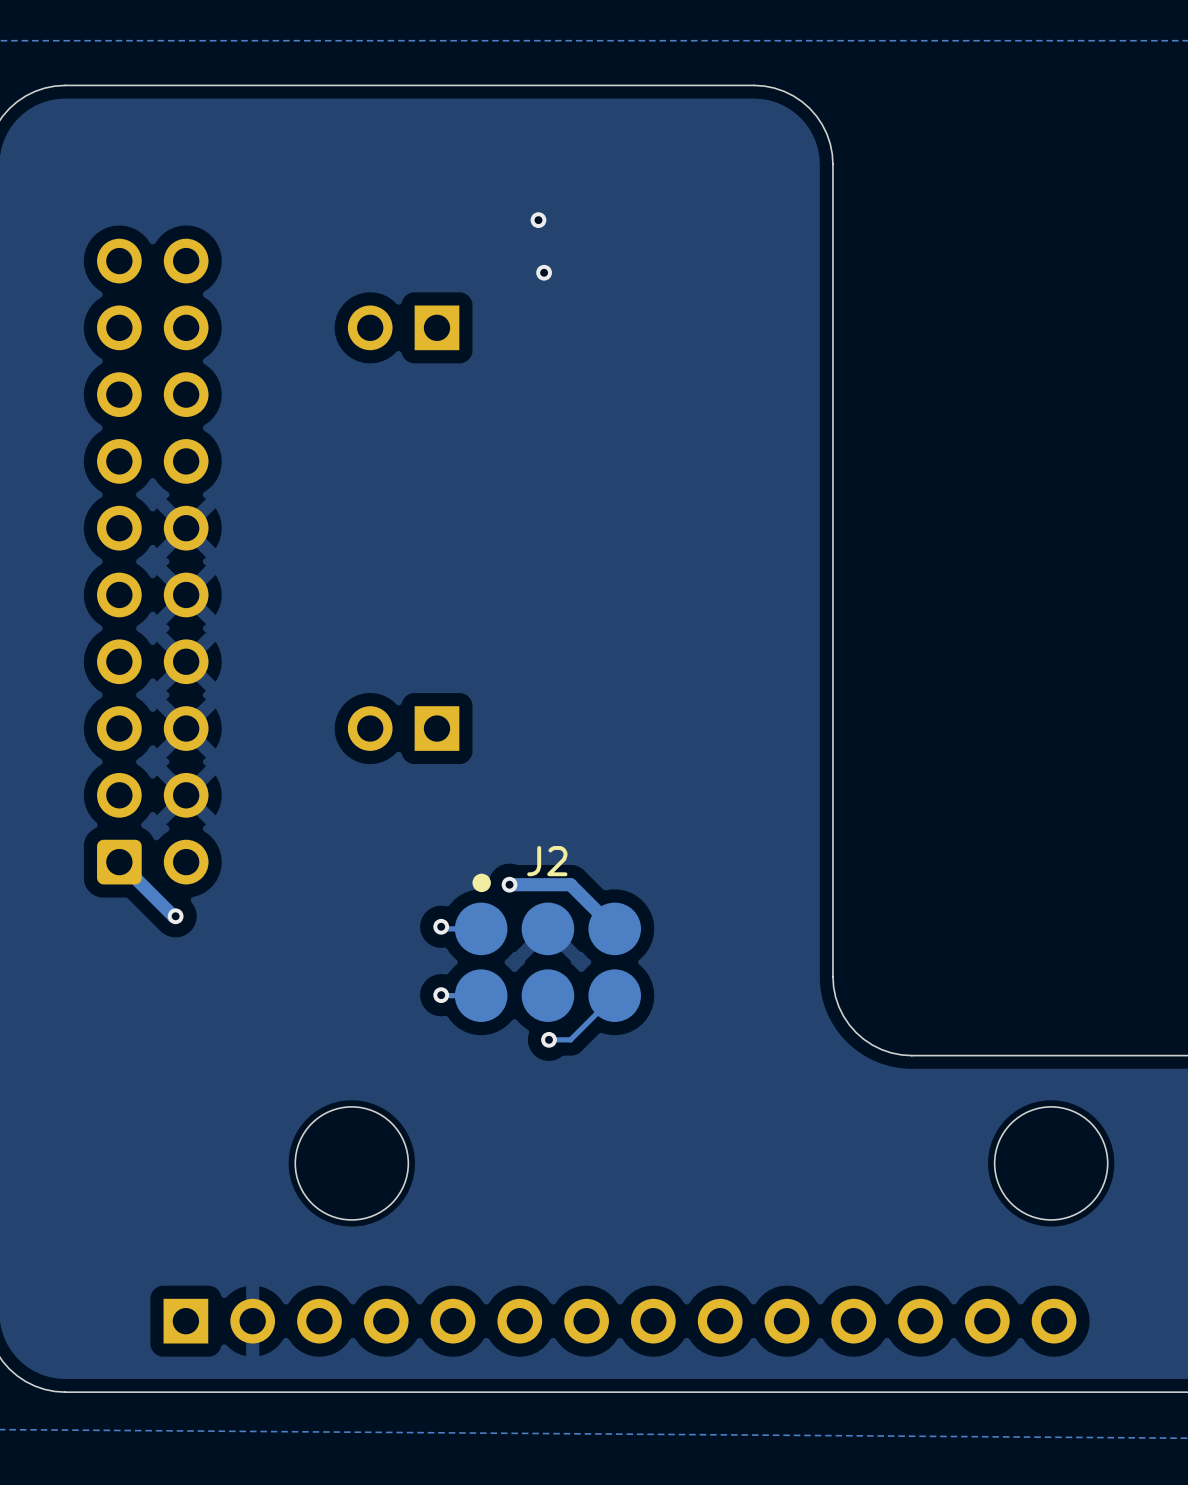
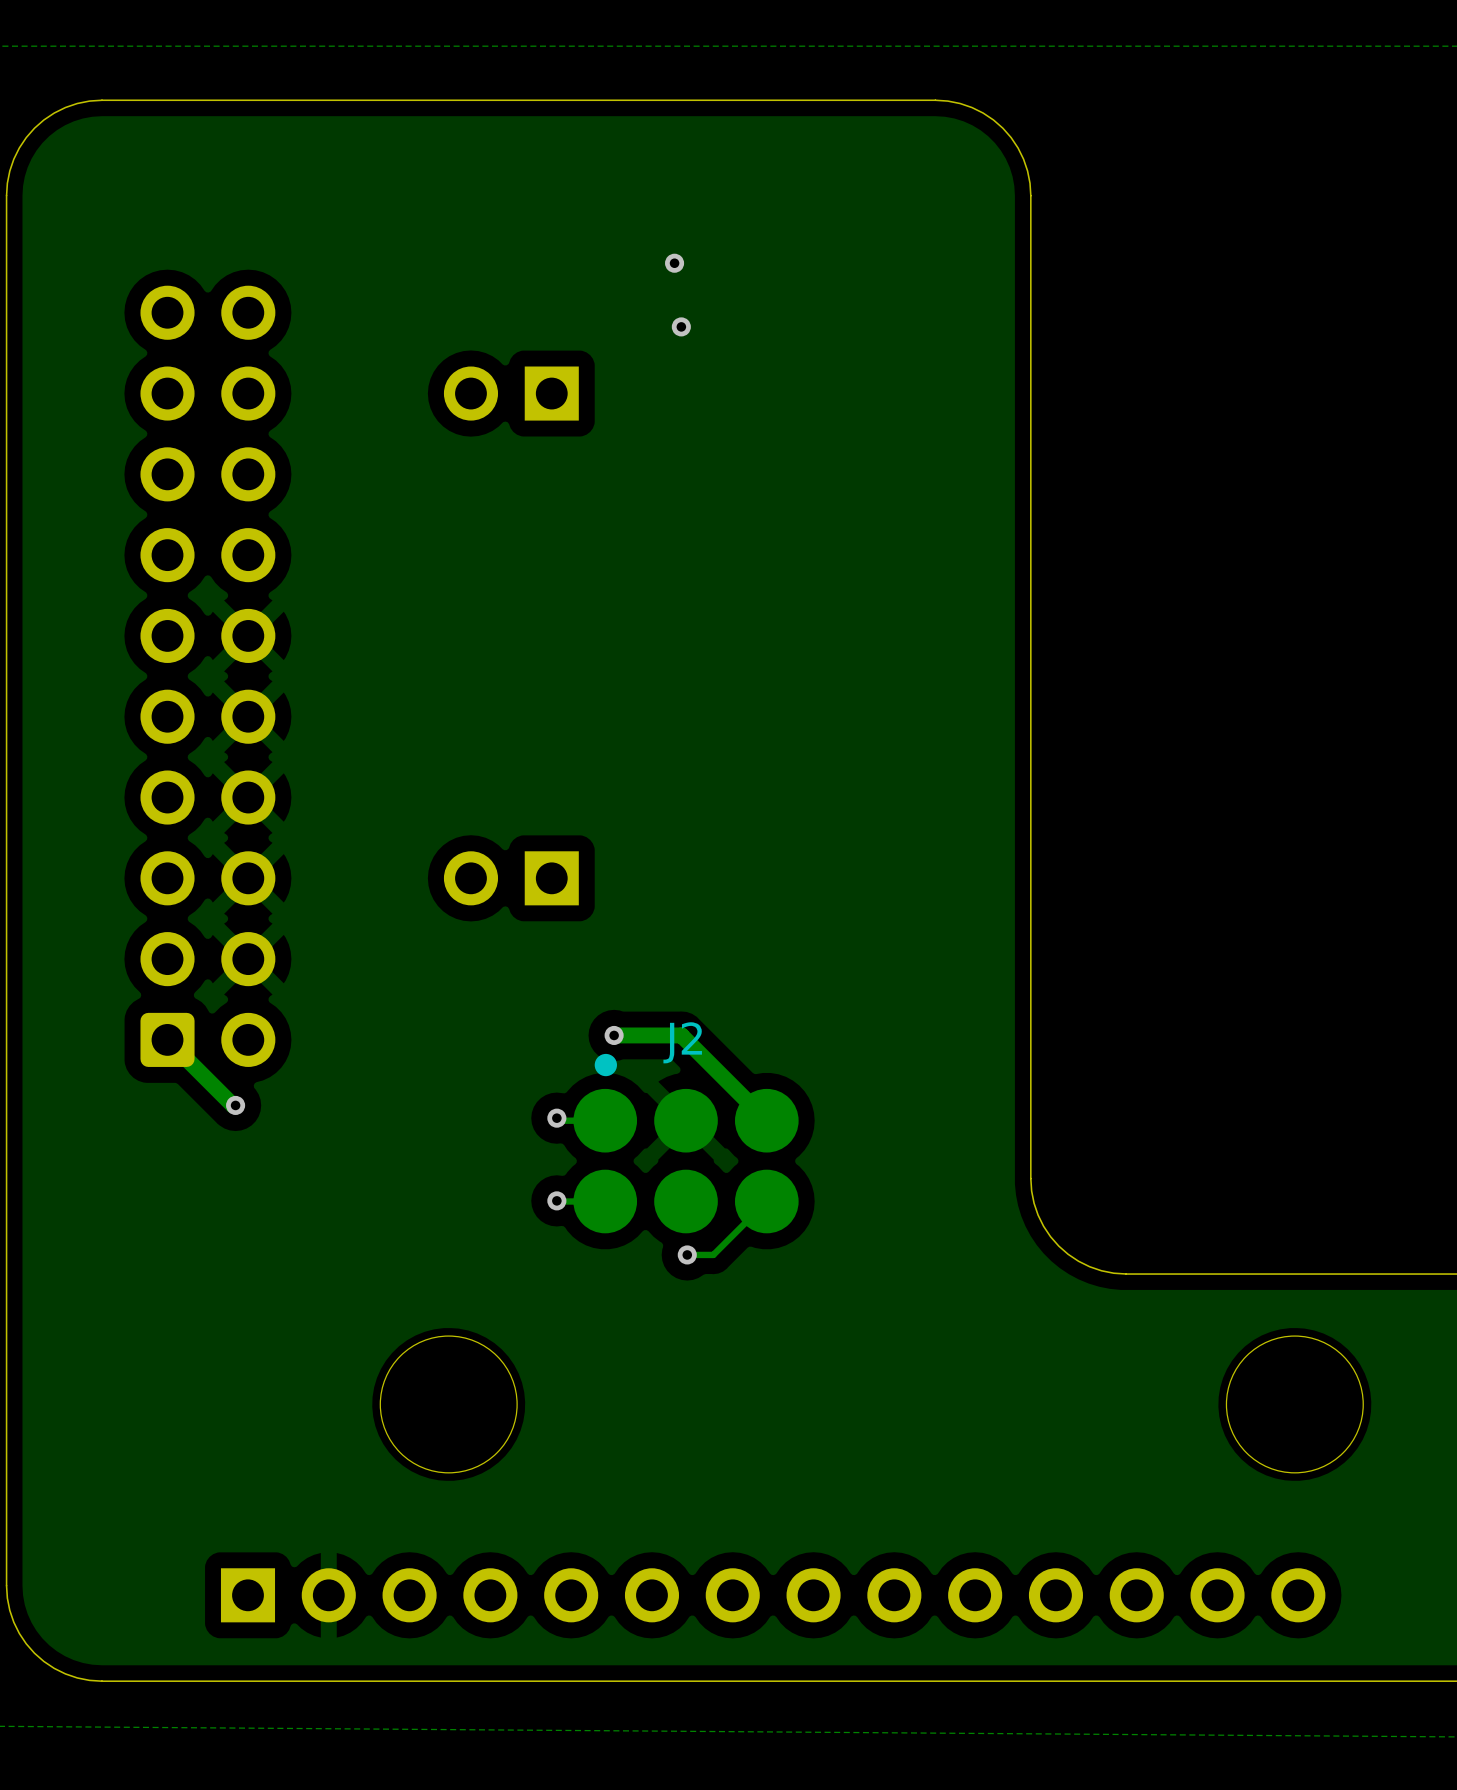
via position: (509, 884) -> (614, 1035)
track: (570, 884) (509, 884) -> (713, 1067) (681, 1035) (614, 1035)

